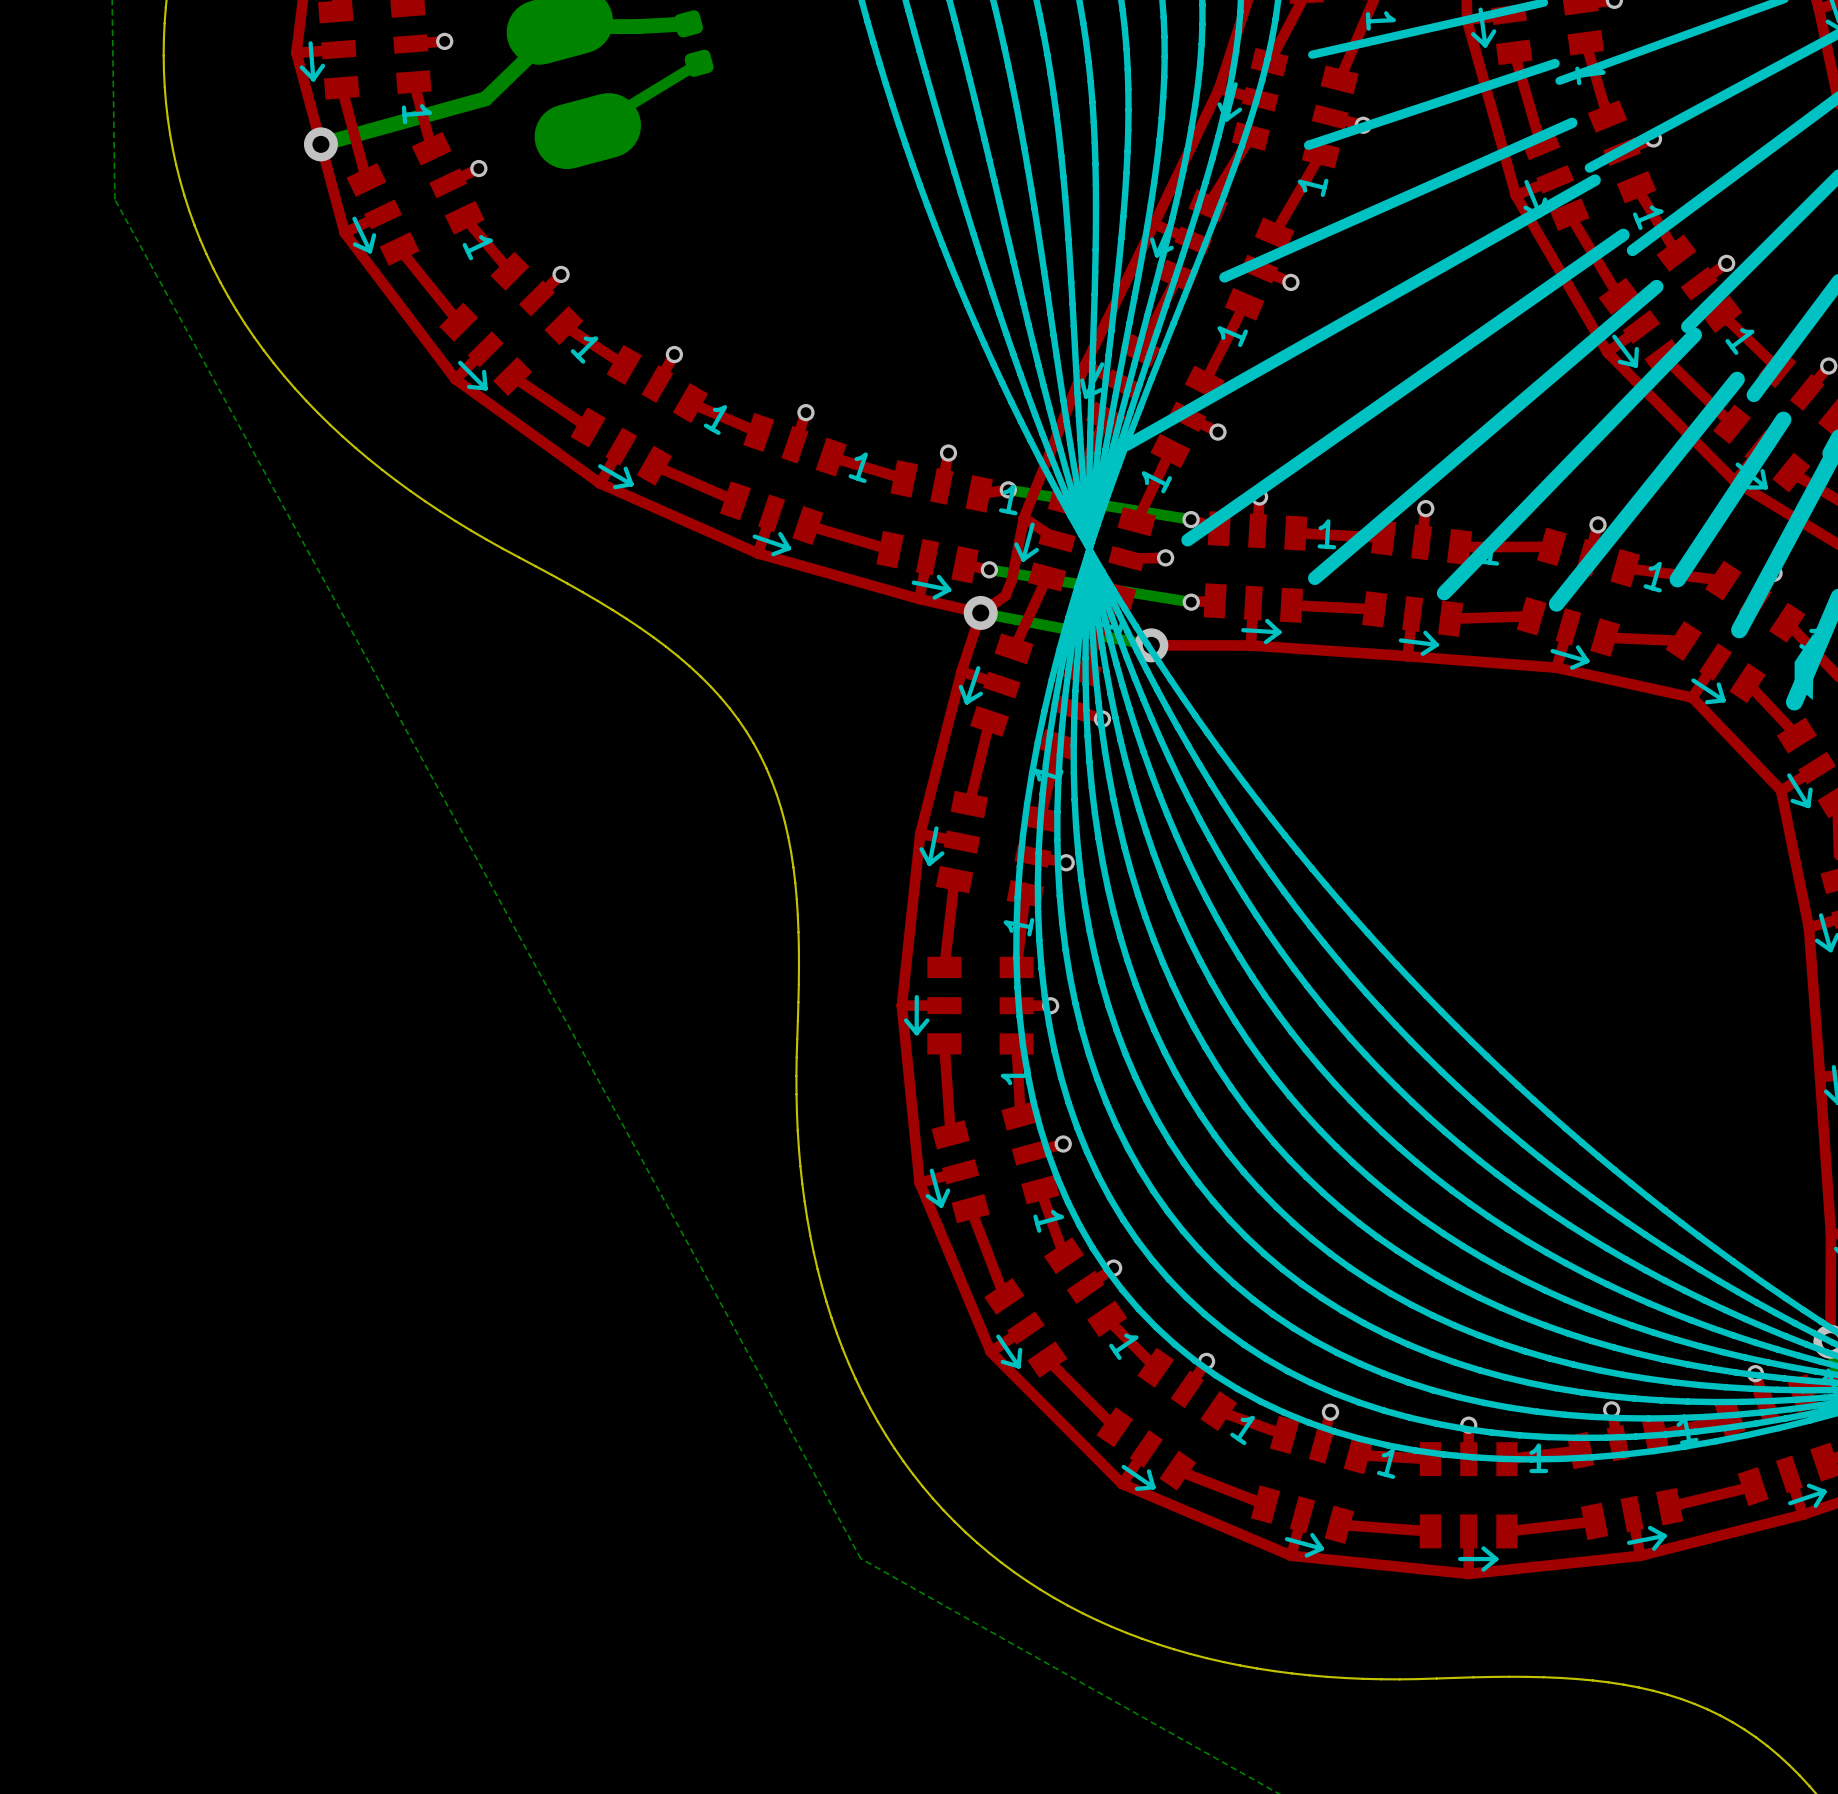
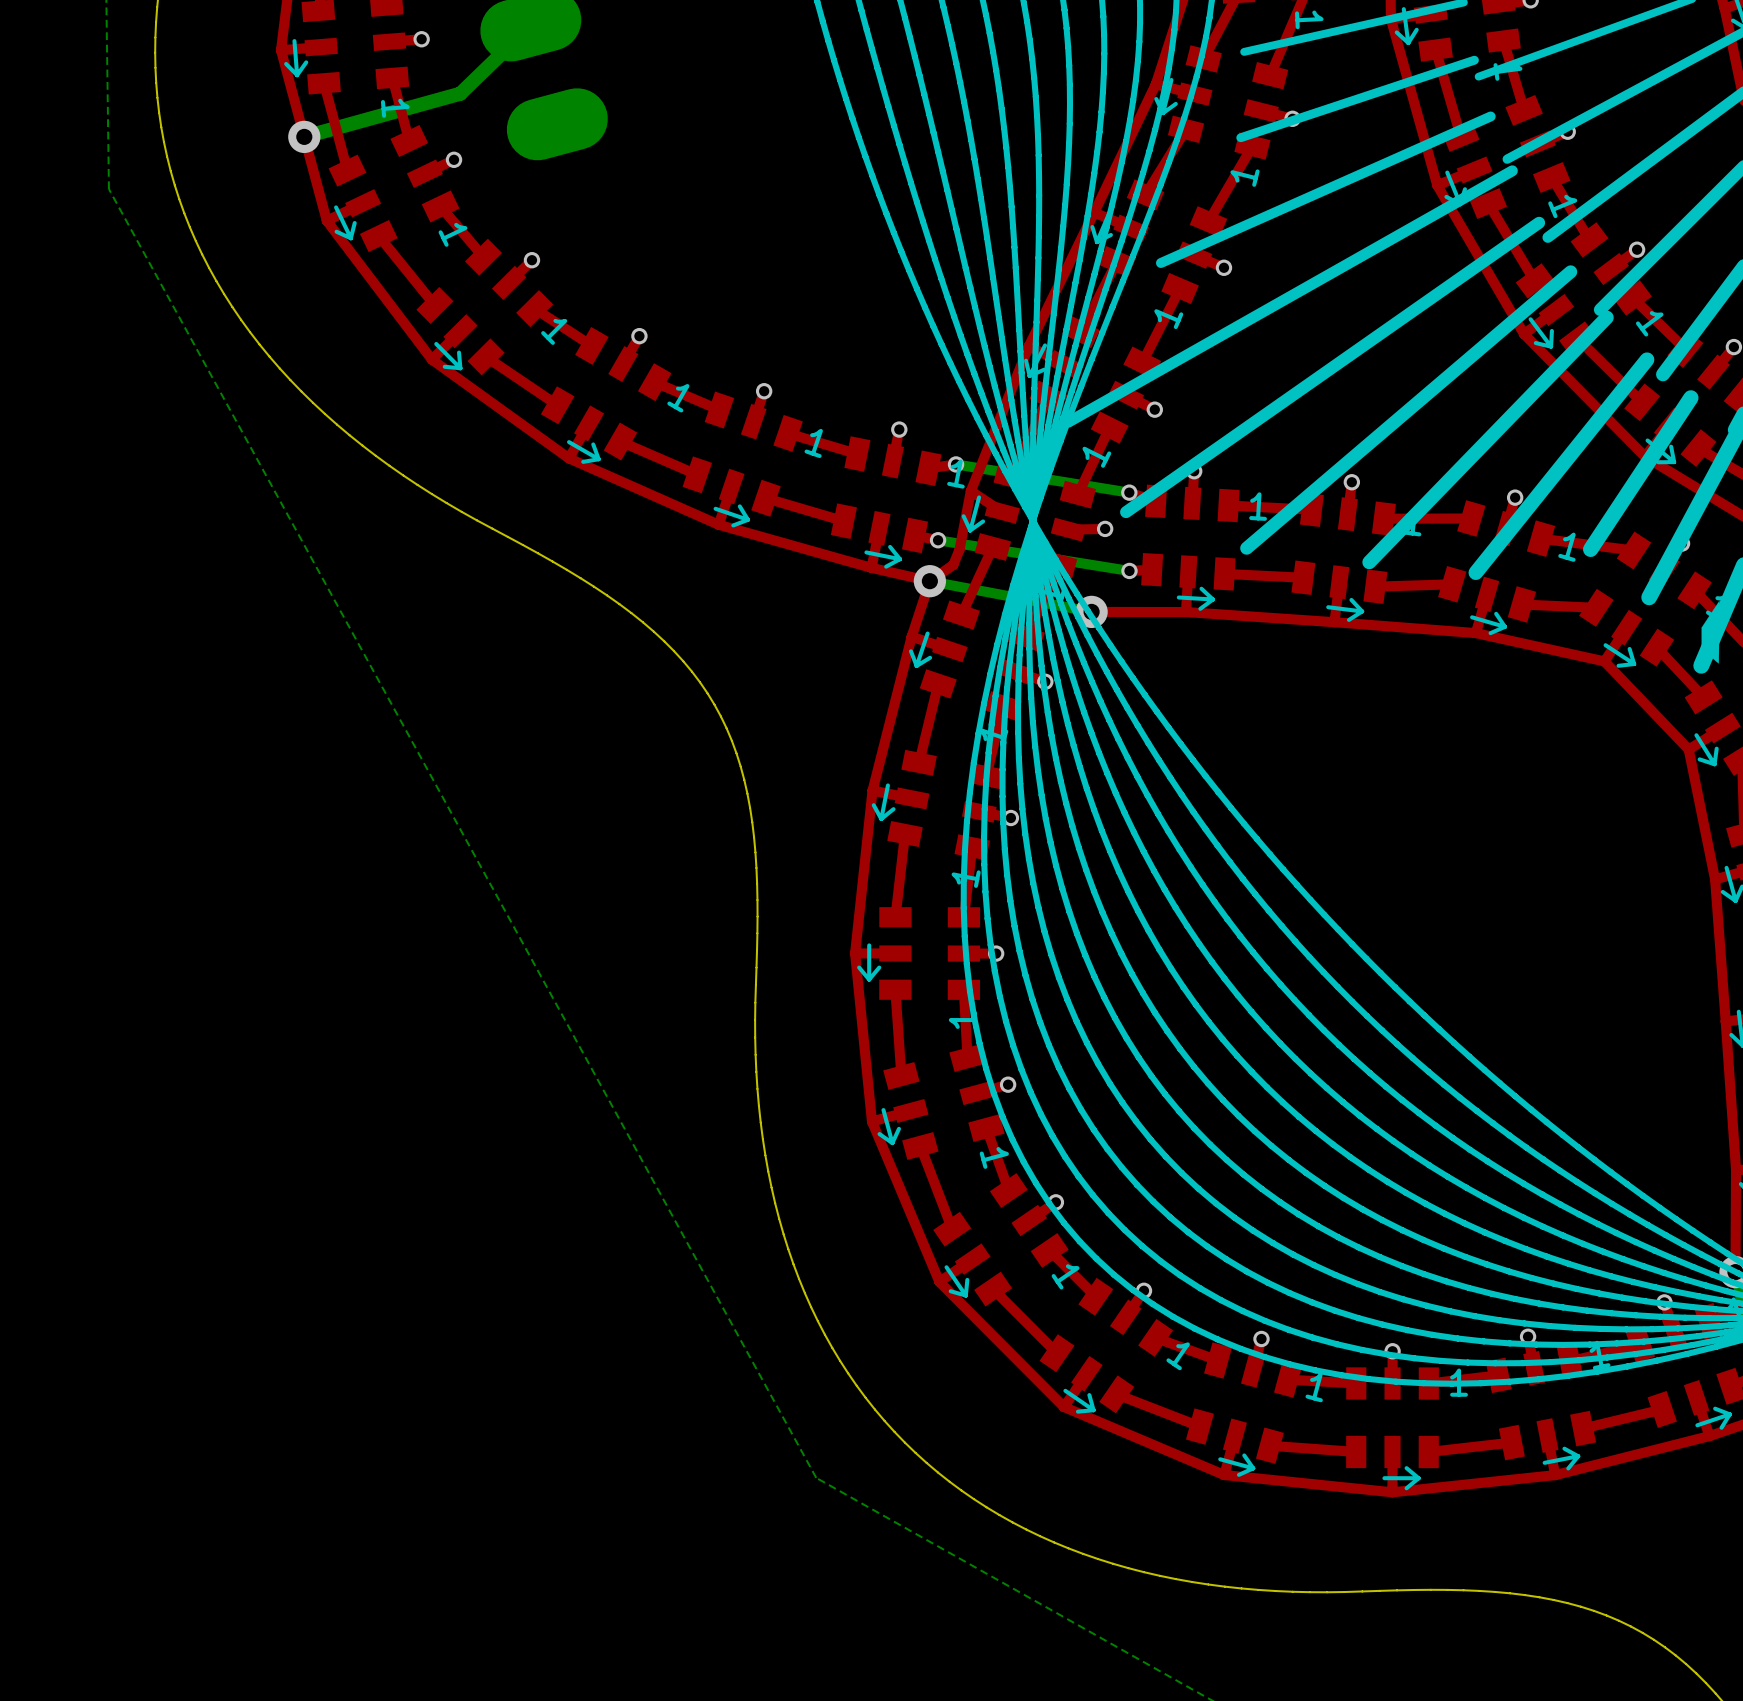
bottom track: (688, 23) (638, 26) (559, 26) -> none
part: (693, 43) -> none
bottom track: (699, 63) (587, 131) -> none

